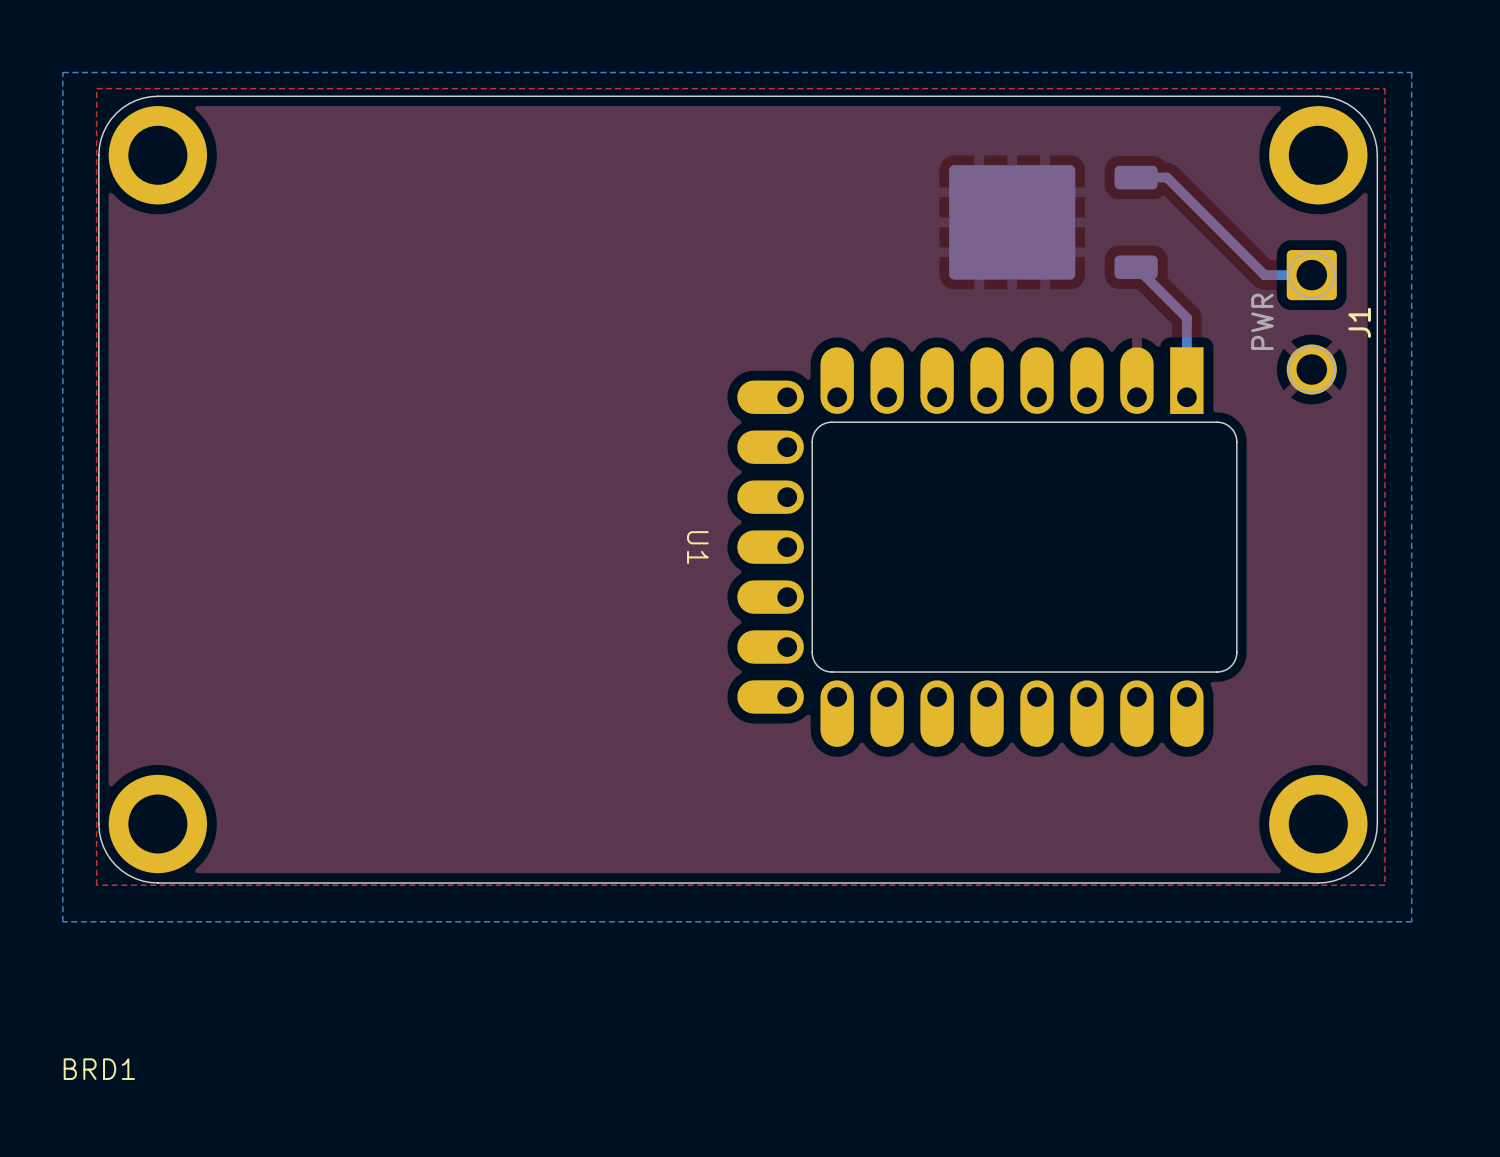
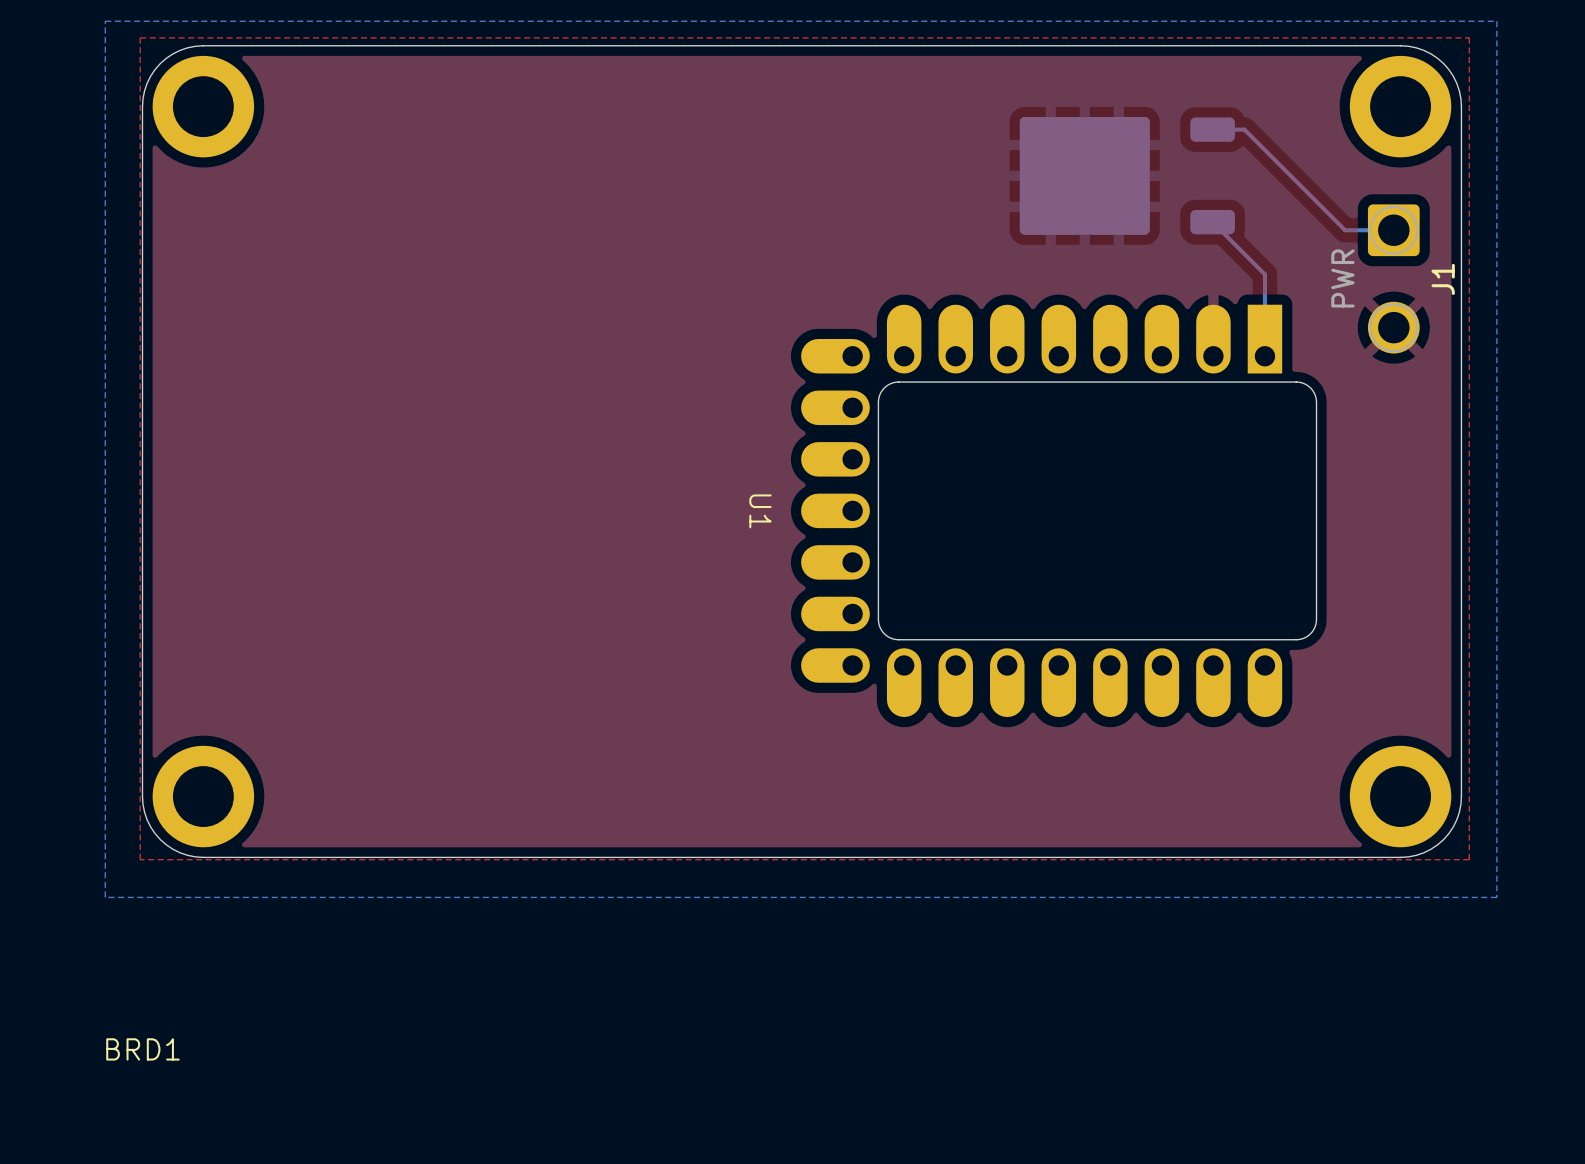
bottom track width: thick (1136, 177) (1167, 177) (1264, 275) (1311, 275) -> thin (1212, 129) (1244, 129) (1345, 230) (1393, 230)
bottom track width: thick (1136, 267) (1186, 317) (1186, 397) -> thin (1212, 222) (1264, 274) (1264, 356)

